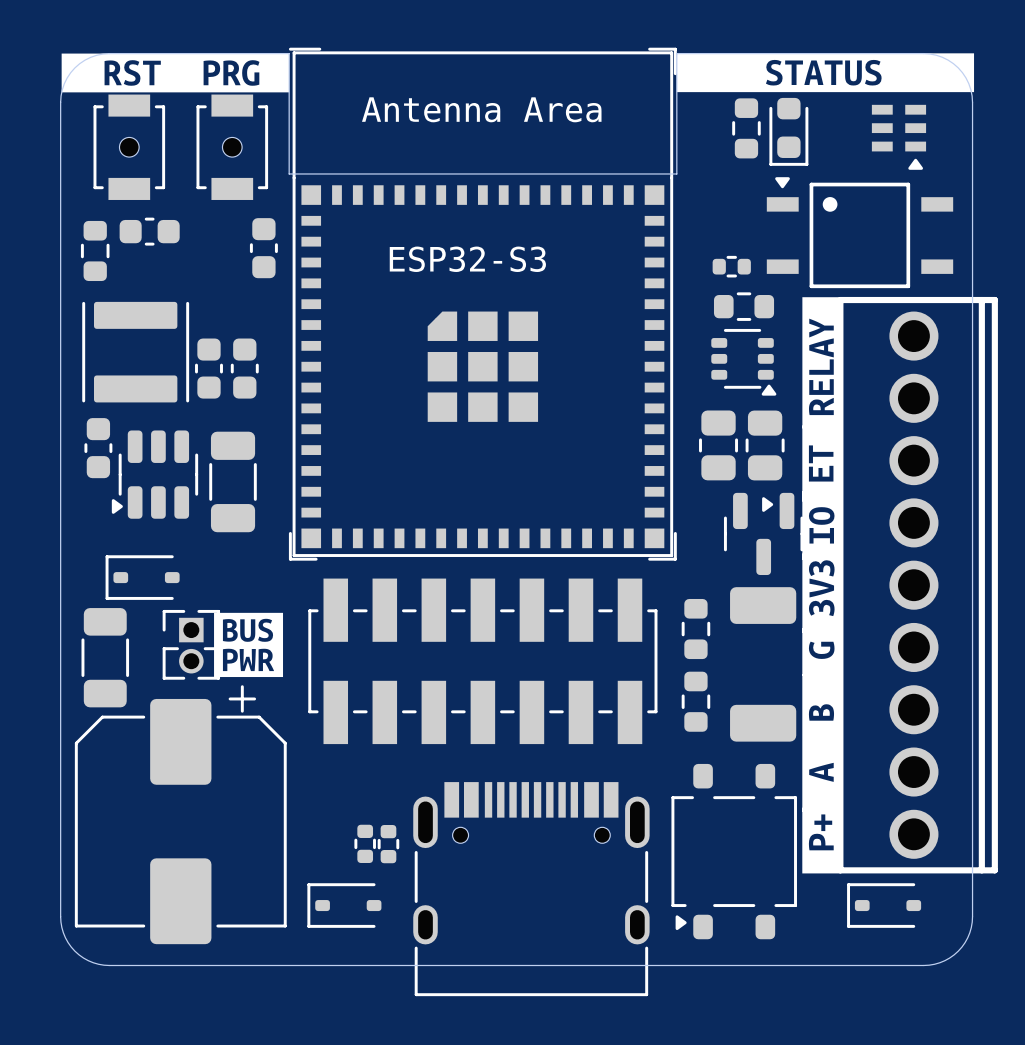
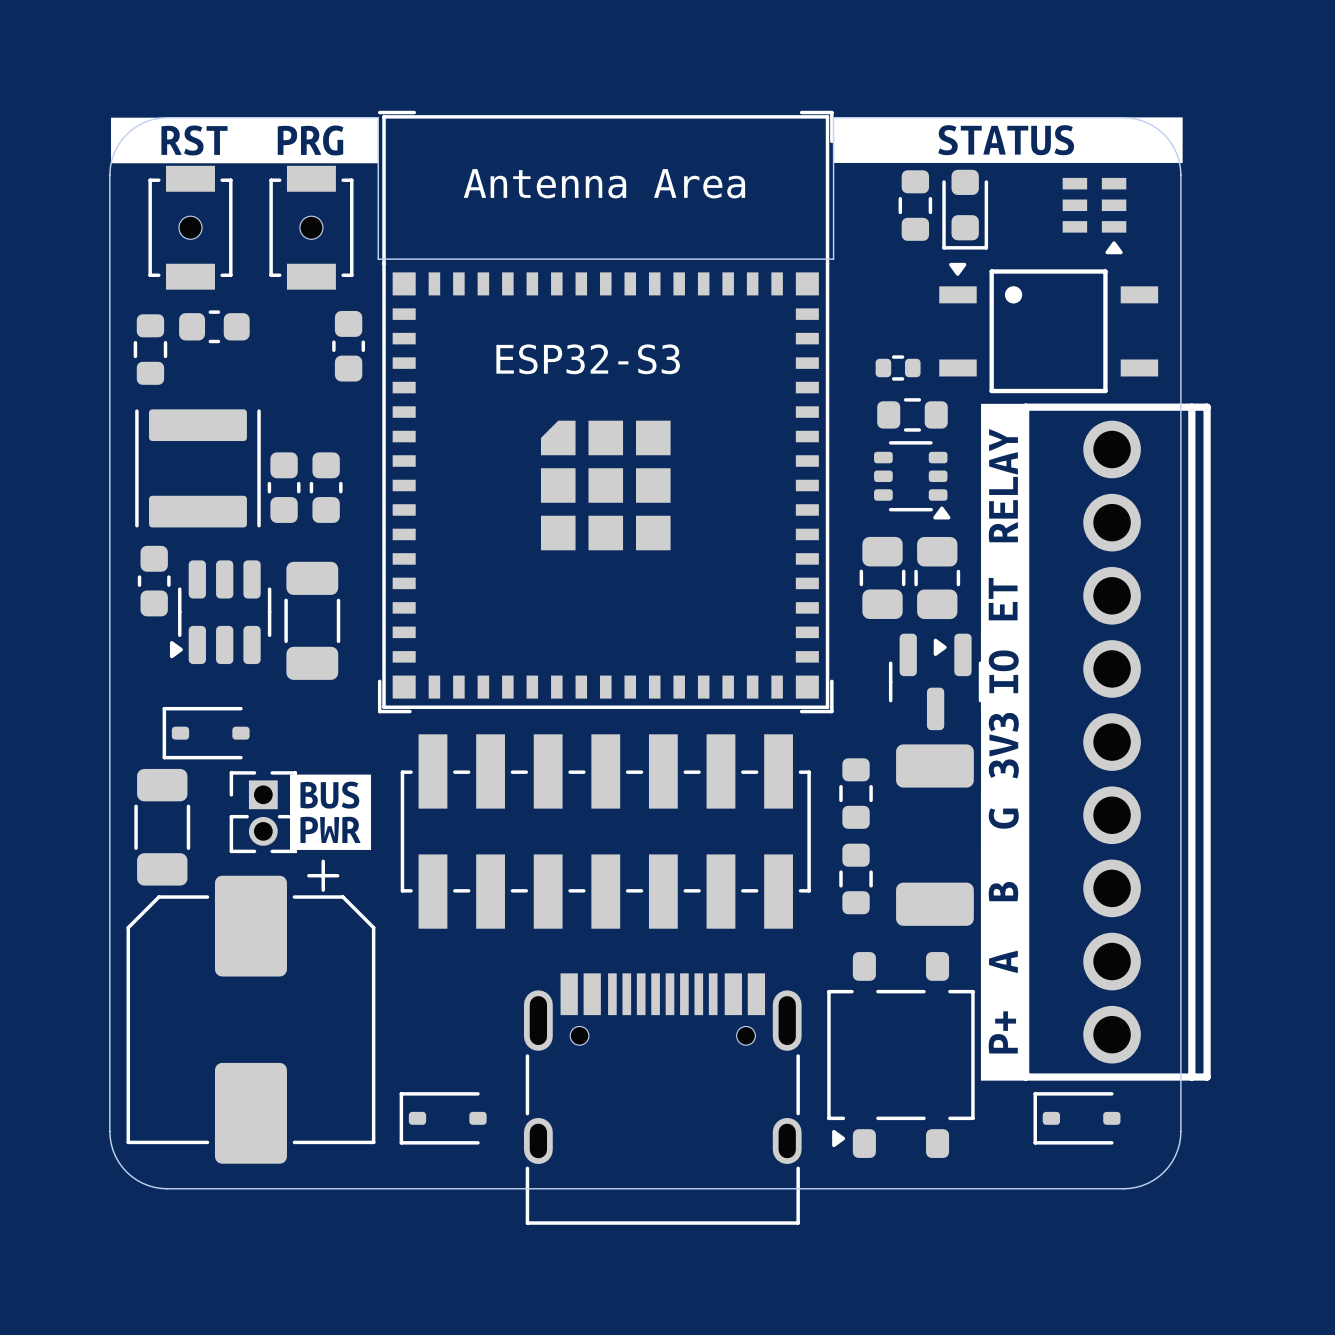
part: (365, 843) -> none
part: (388, 844) -> none

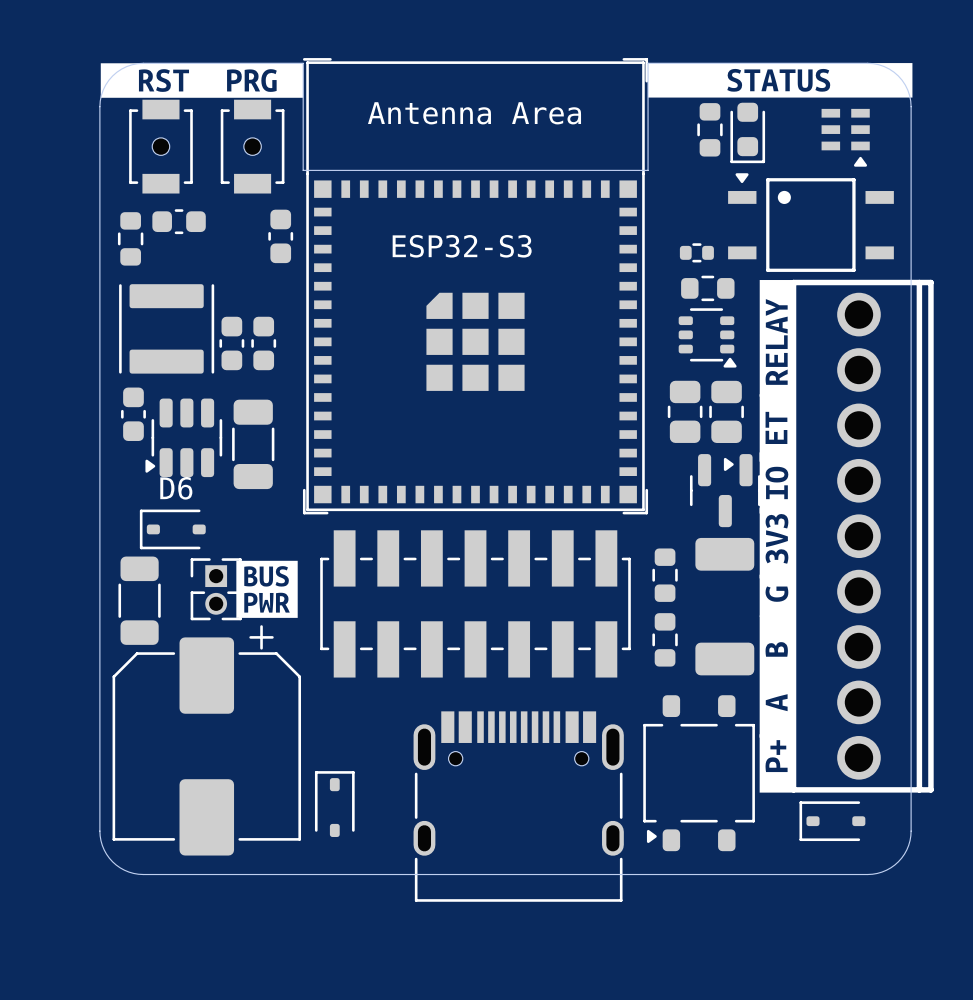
D6 name: none -> D6 (176, 488)
part rotation: 0° (443, 1118) -> 90° clockwise (334, 804)

